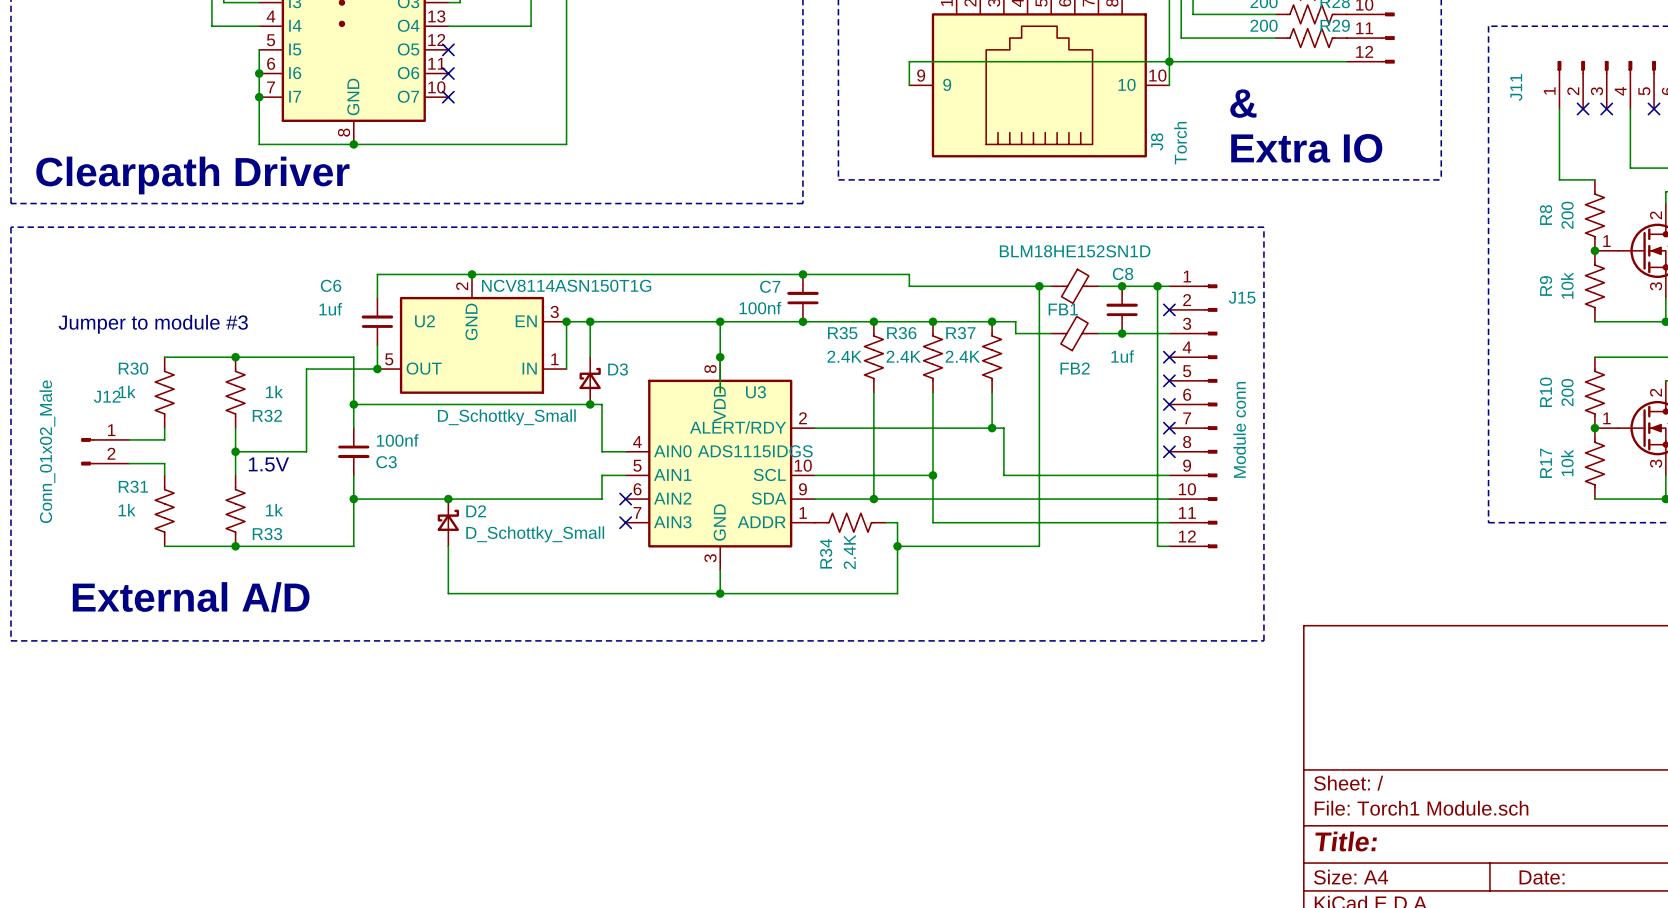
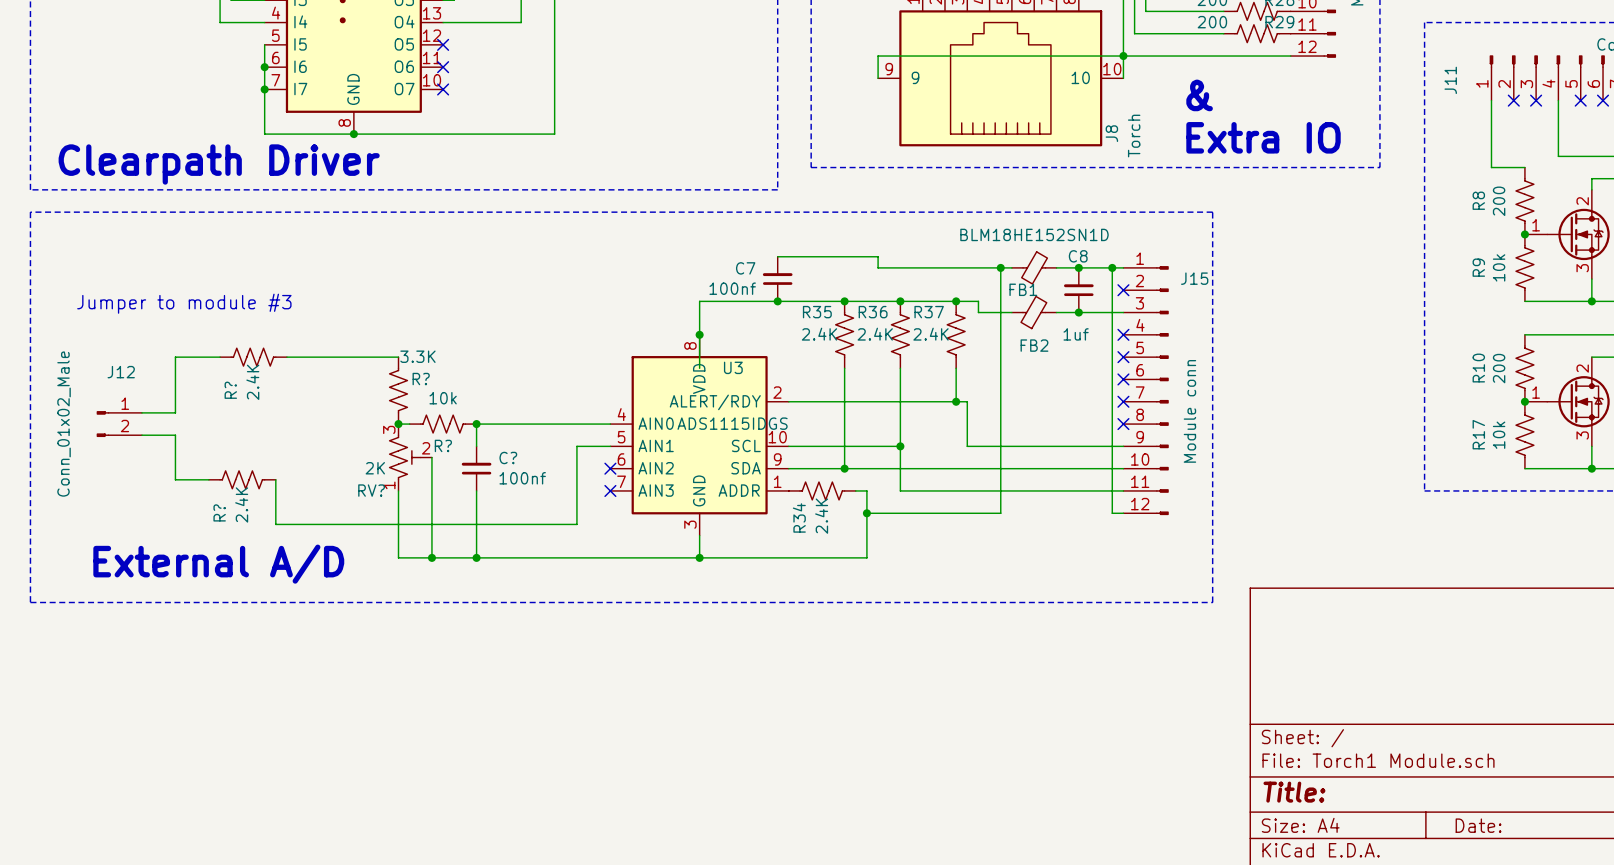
junction: (471, 274) -> none
wire: (802, 274) (377, 274) (377, 298) -> none
junction: (802, 274) -> none
C6: 1uf (377, 321) -> none
junction: (566, 321) -> none
wire: (590, 321) (590, 357) -> none
junction: (590, 321) -> none
wire: (720, 321) (566, 321) (566, 369) -> none
junction: (720, 321) -> none
U2: NCV8114ASN150T1G (471, 334) -> none
wire: (377, 345) (377, 369) (306, 369) (306, 451) (235, 451) -> none
wire: (164, 357) (353, 357) (353, 428) -> none
junction: (235, 357) -> none
junction: (377, 369) -> none
wire: none -> (220, 357) (175, 357) (175, 401)
R?: none -> 2.4K (253, 357)
wire: none -> (286, 357) (398, 357)
D3: D_Schottky_Small (590, 380) -> none
R30: 1k (164, 392) -> none
R32: 1k (235, 392) -> none
wire: (353, 404) (602, 404) (602, 451) -> (476, 446) (476, 424) (588, 424)
junction: (353, 404) -> none
junction: (590, 404) -> none
R?: none -> 3.3K (398, 390)
wire: (235, 428) (235, 475) -> none
junction: (235, 451) -> none
C3: 100nf (353, 451) -> none
wire: none -> (398, 424) (409, 424)
junction: none -> (398, 424)
R?: none -> 10k (443, 424)
junction: none -> (476, 424)
text: 1.5V (268, 464) -> none
wire: none -> (175, 446) (175, 479) (208, 479)
wire: (353, 475) (353, 546) (164, 546) -> none
wire: (602, 475) (602, 499) (353, 499) -> (588, 446) (576, 446) (576, 524) (275, 524) (275, 479)
RV?: none -> 2K (410, 457)
wire: none -> (431, 457) (431, 557)
junction: (353, 499) -> none
junction: (448, 499) -> none
C?: none -> 100nf (476, 468)
R31: 1k (164, 510) -> none
R33: 1k (235, 510) -> none
R?: none -> 2.4K (242, 479)
D2: D_Schottky_Small (448, 522) -> none
wire: none -> (476, 490) (476, 557)
junction: (235, 546) -> none
wire: (448, 546) (448, 593) -> (398, 490) (398, 557) (443, 557)
junction: none -> (431, 557)
junction: none -> (476, 557)

